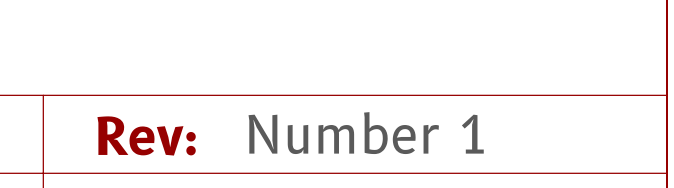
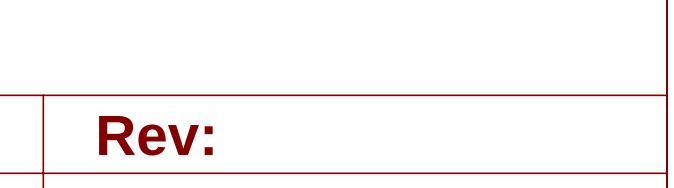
text: Number 1 (366, 133) -> none

